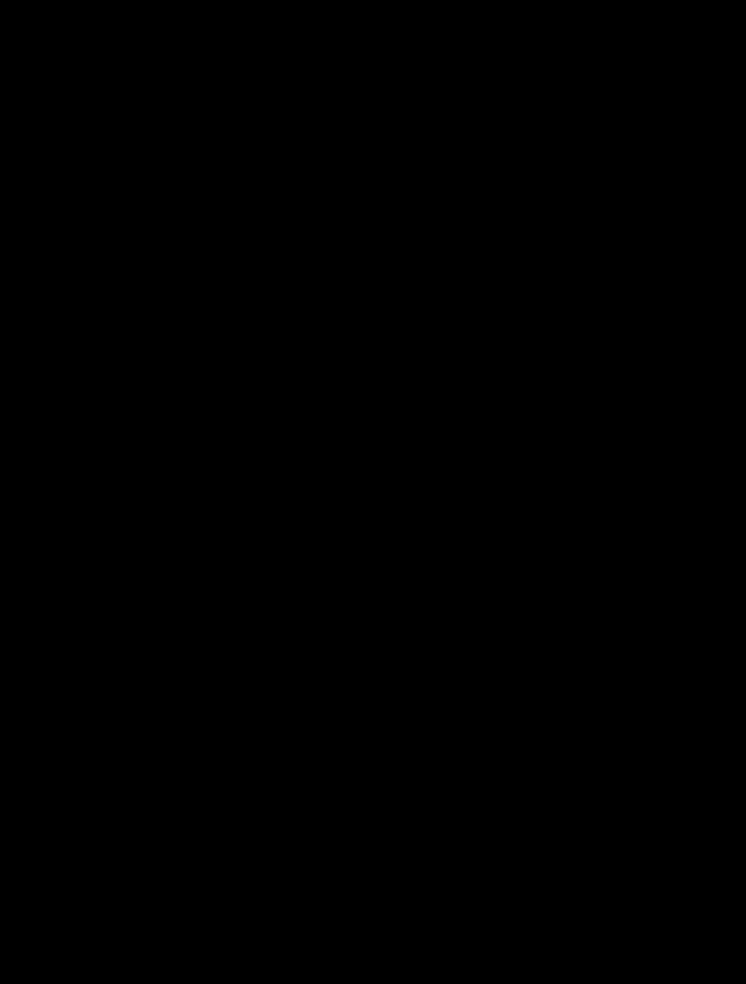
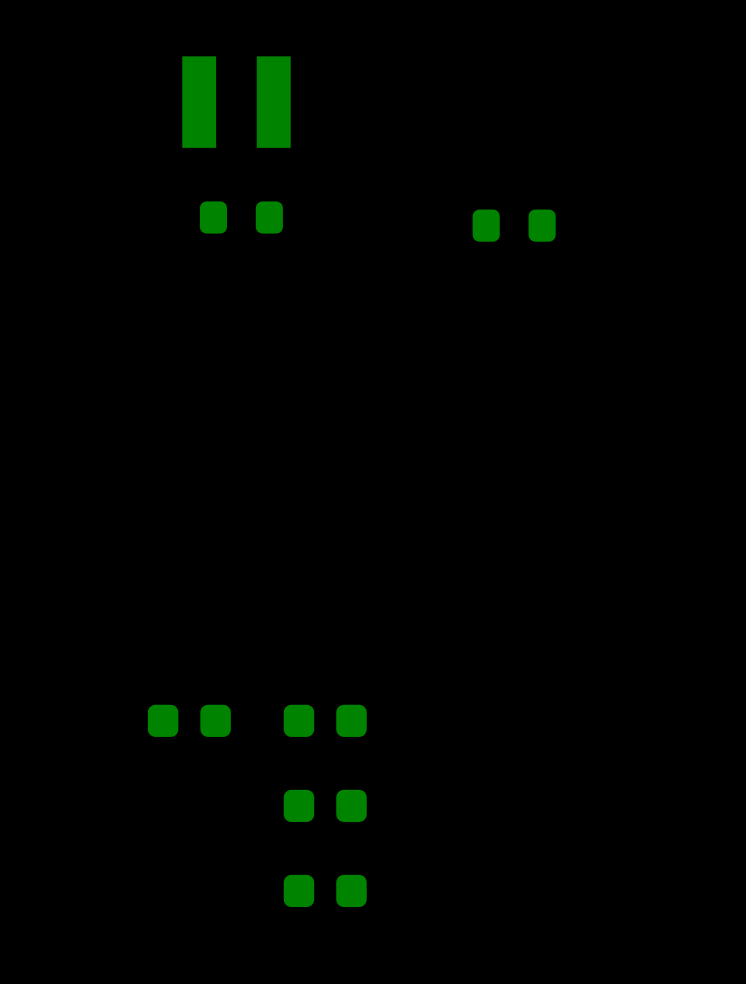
part: none -> (236, 102)
part: none -> (241, 217)
part: none -> (514, 225)
part: none -> (189, 720)
part: none -> (325, 720)
part: none -> (325, 805)
part: none -> (325, 890)

